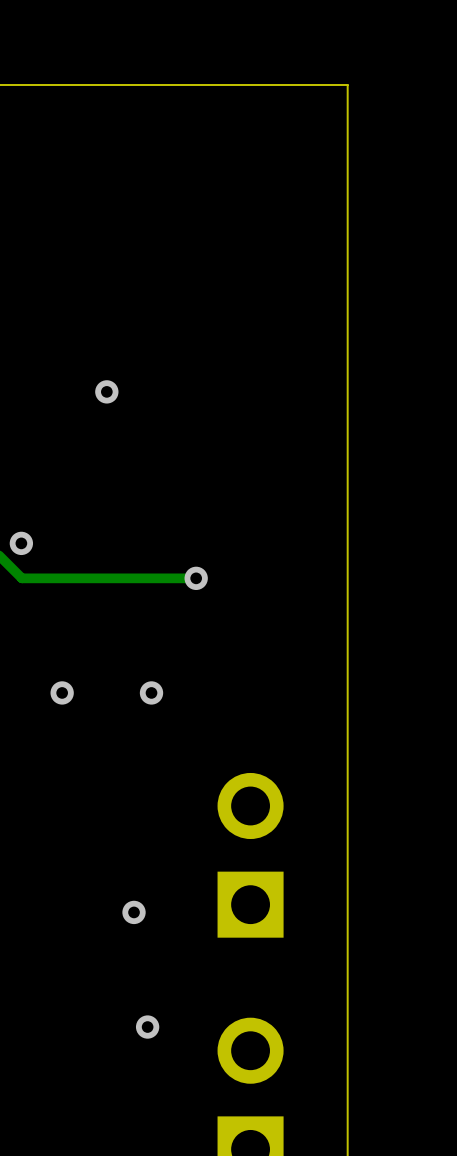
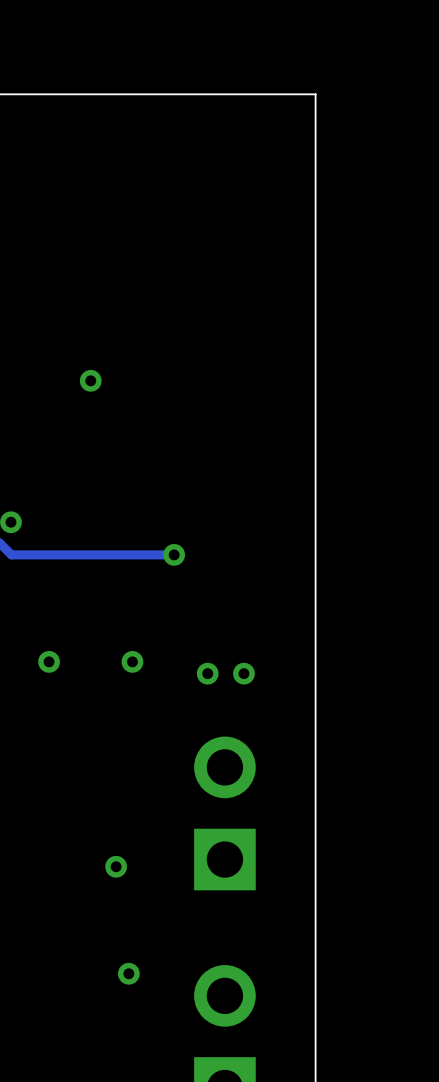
via: none -> (207, 673)
via: none -> (243, 673)

